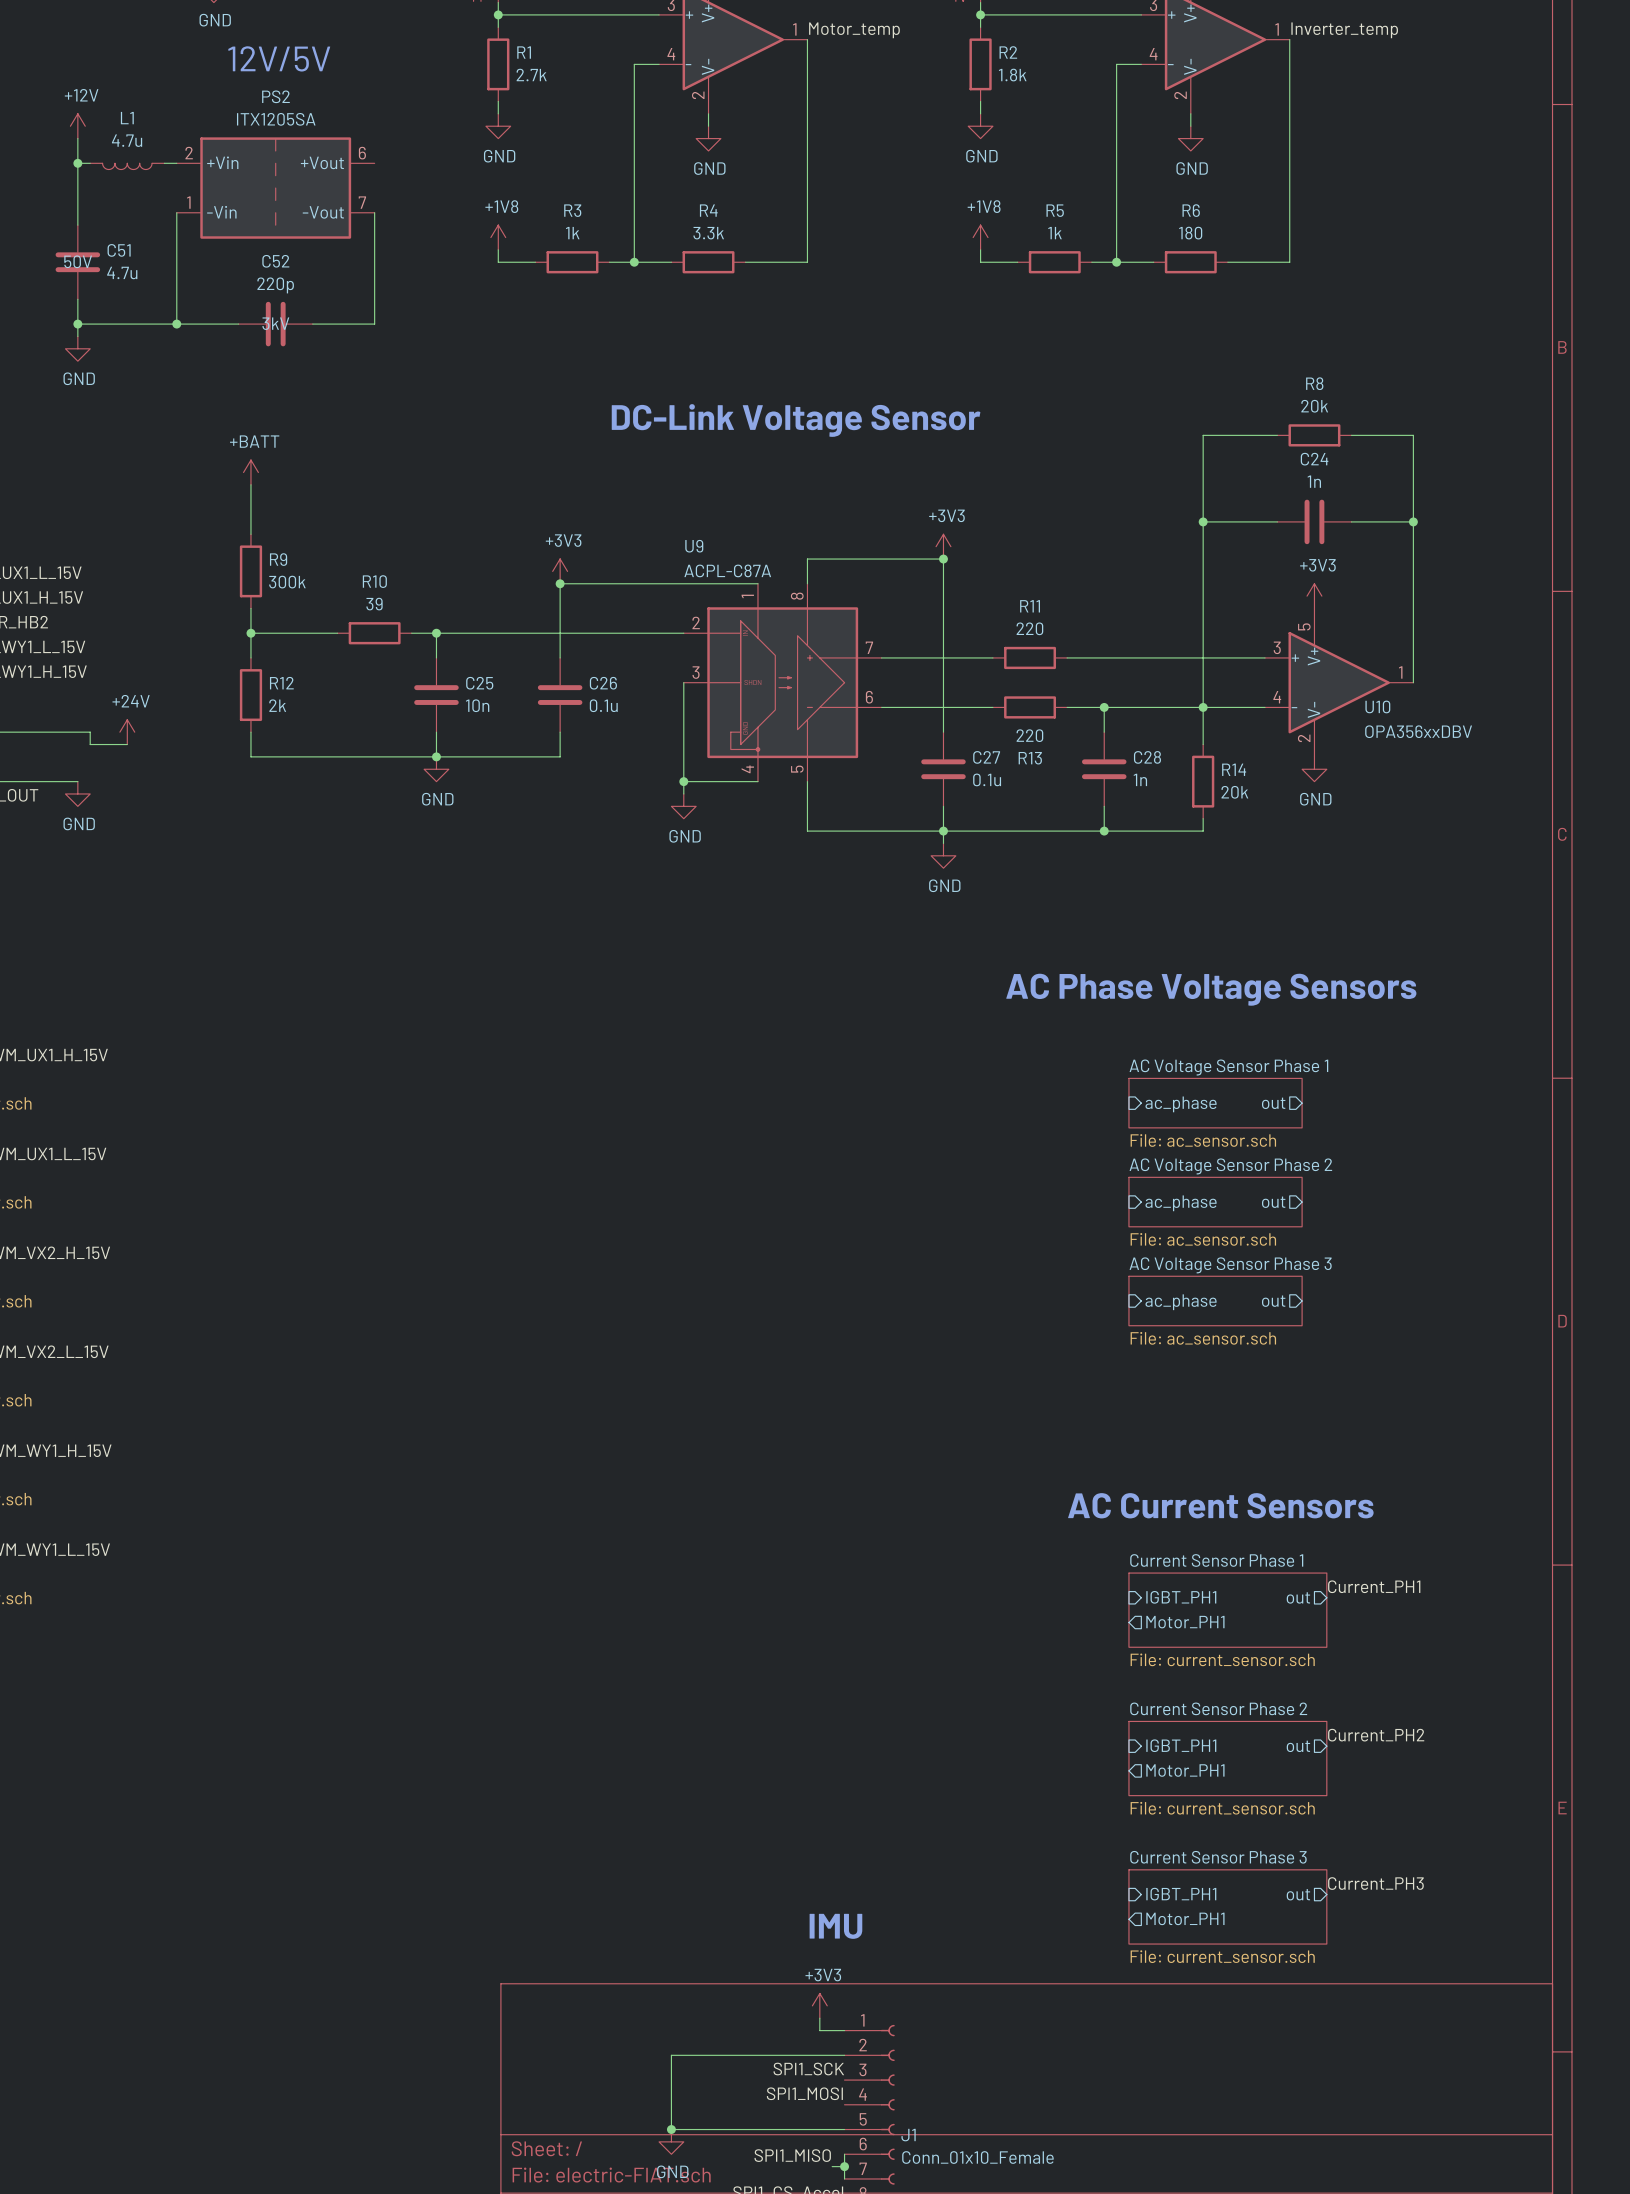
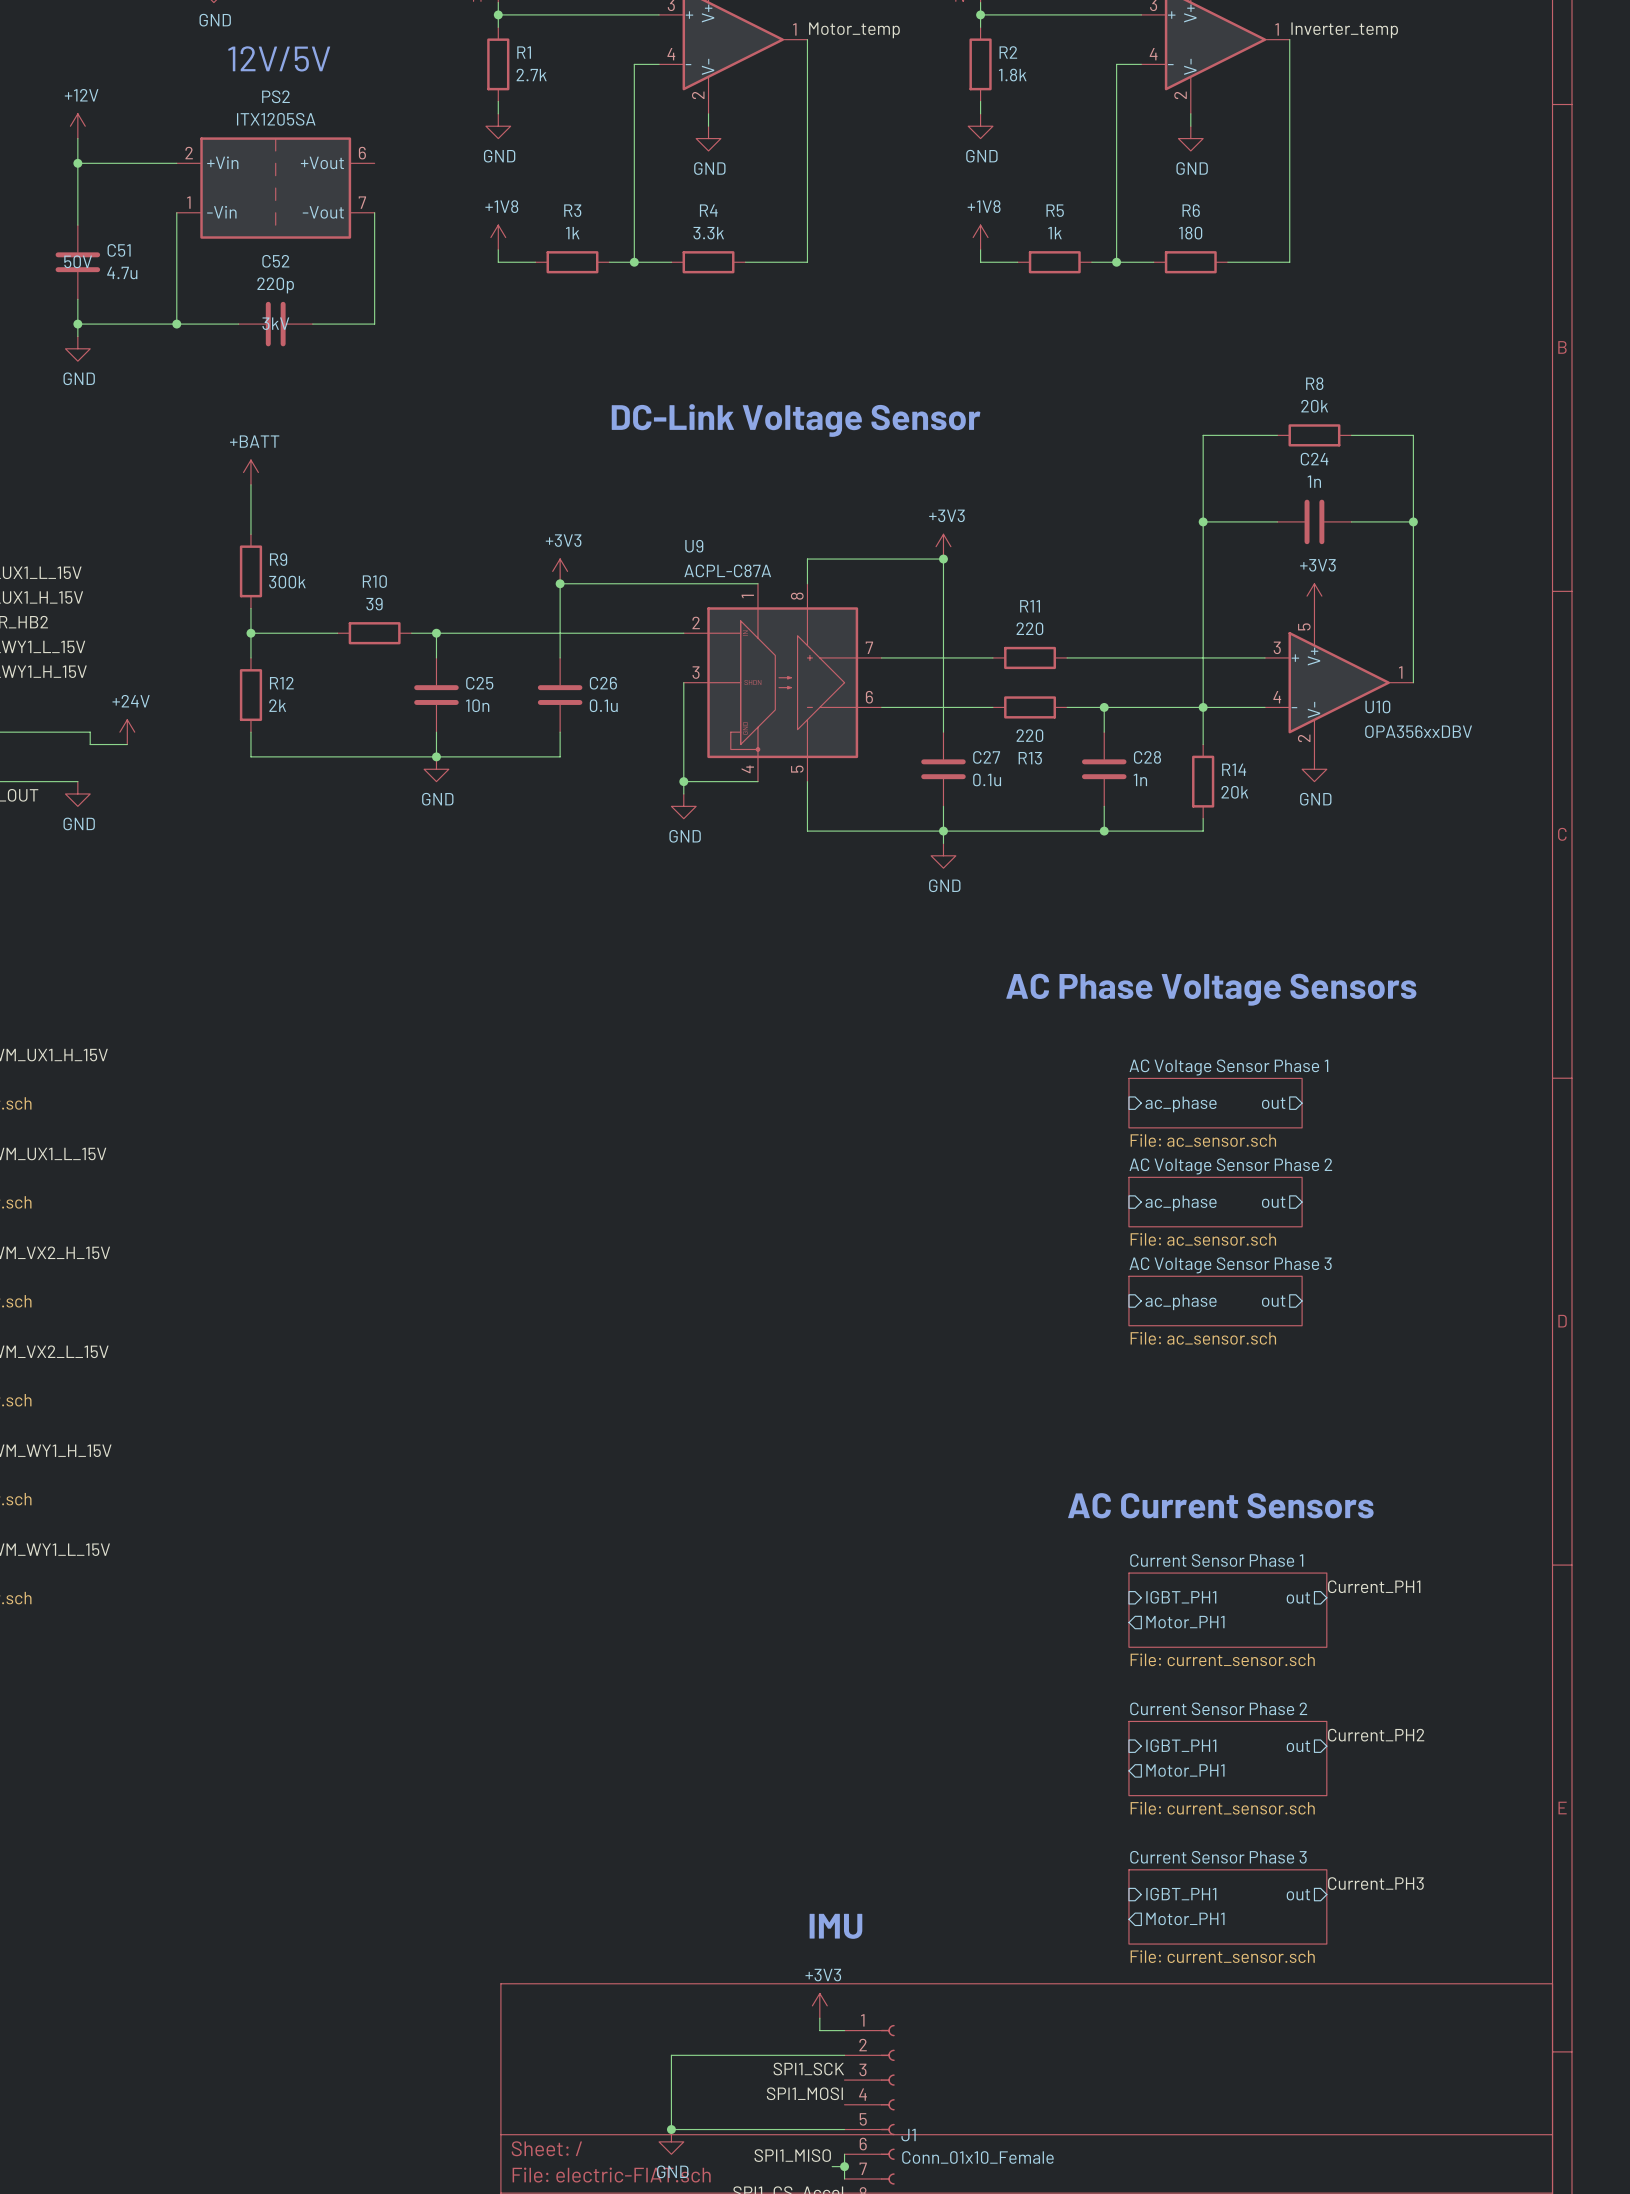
wire: none -> (90, 163) (164, 163)
L1: 4.7u (127, 166) -> none

